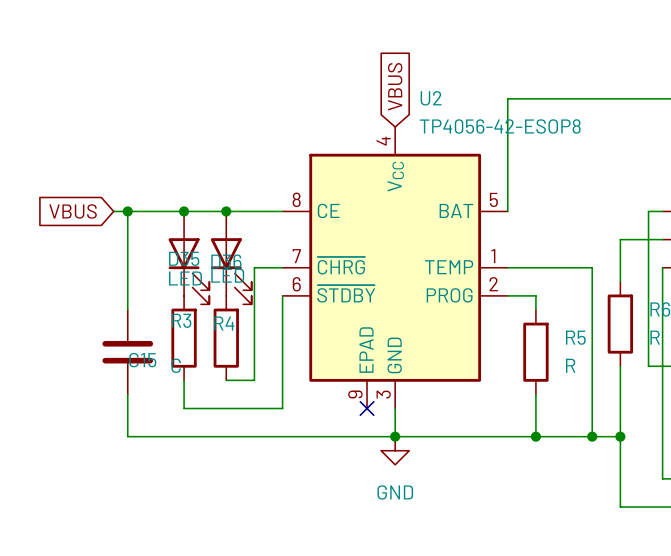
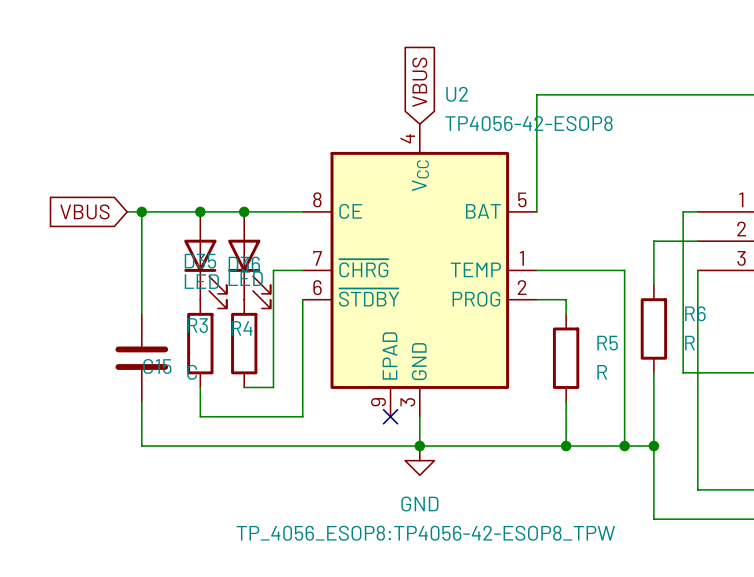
U2 text: none -> TP_4056_ESOP8:TP4056-42-ESOP8_TPW (425, 533)

